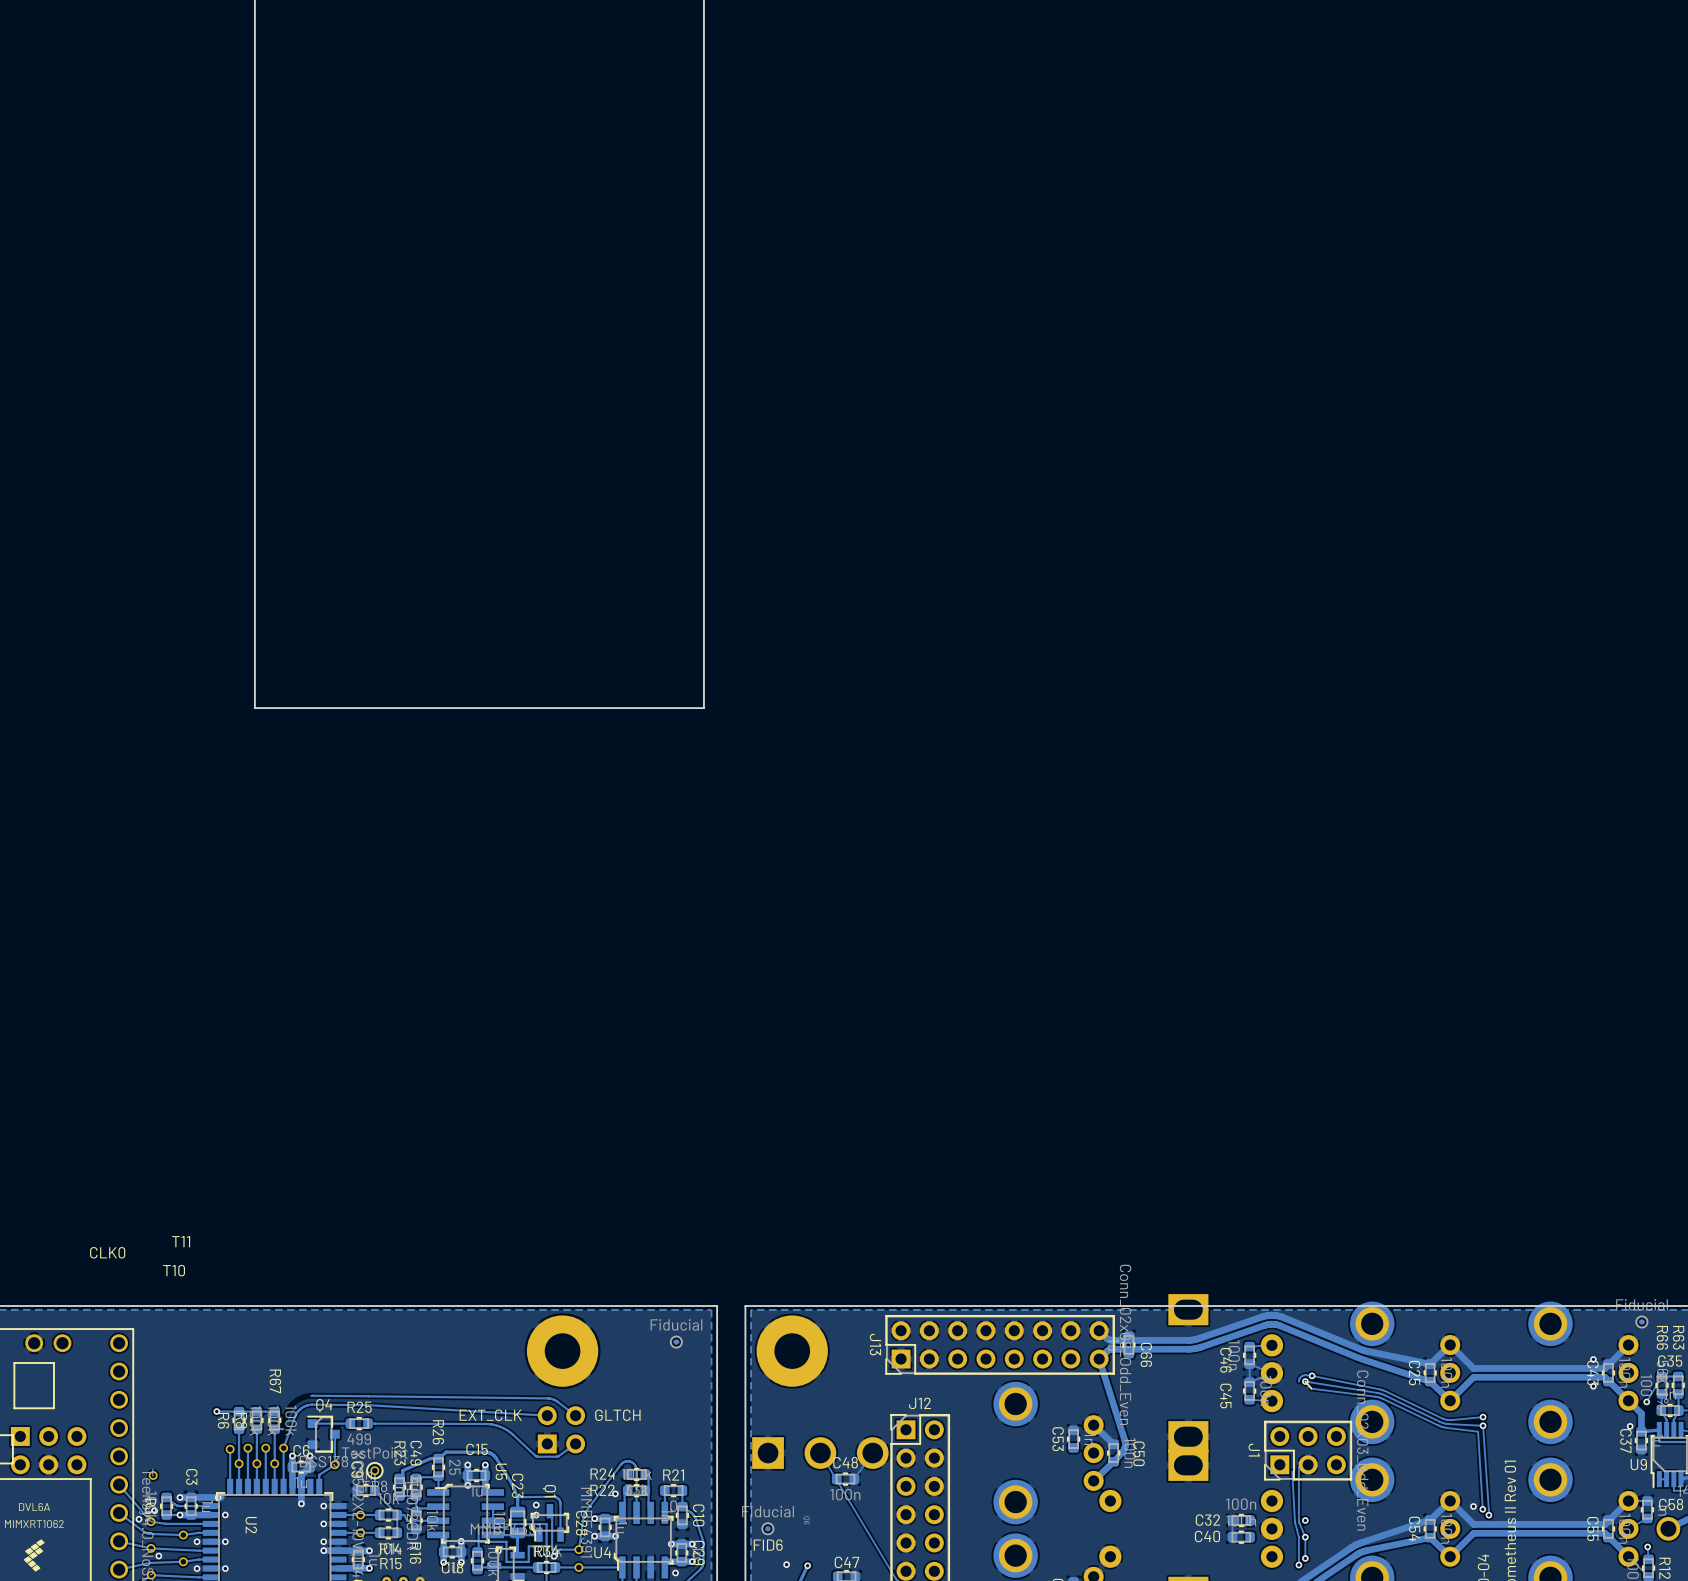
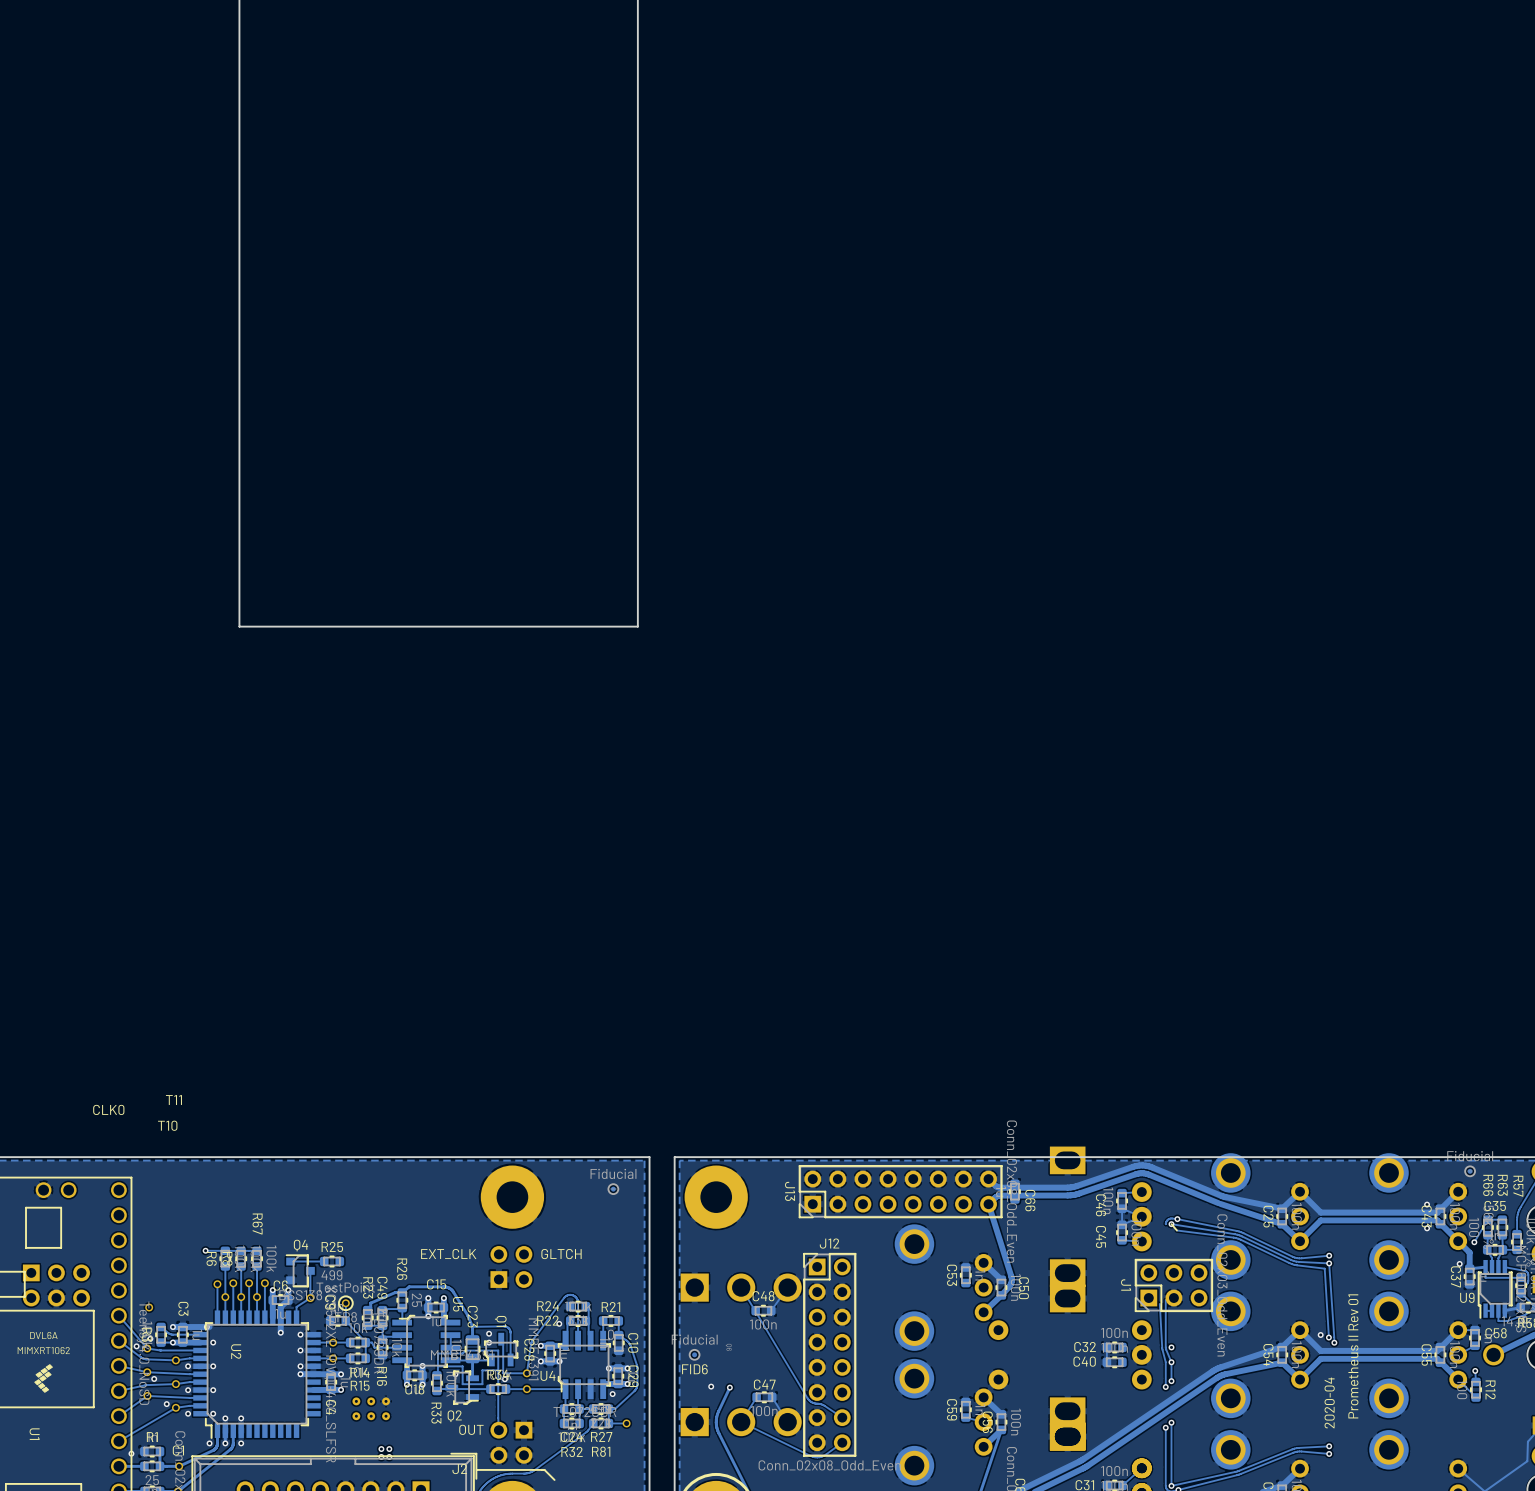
track: (311, 1395) (368, 1396) -> none
track: (368, 1396) (548, 1398) (556, 1401) (575, 1415) -> none
track: (547, 1415) (369, 1405) (310, 1404) (302, 1407) (296, 1413) (283, 1448) -> none
track: (368, 1423) (492, 1424) (509, 1431) (537, 1456) (557, 1456) (575, 1443) -> none
track: (283, 1429) (274, 1429) -> none

